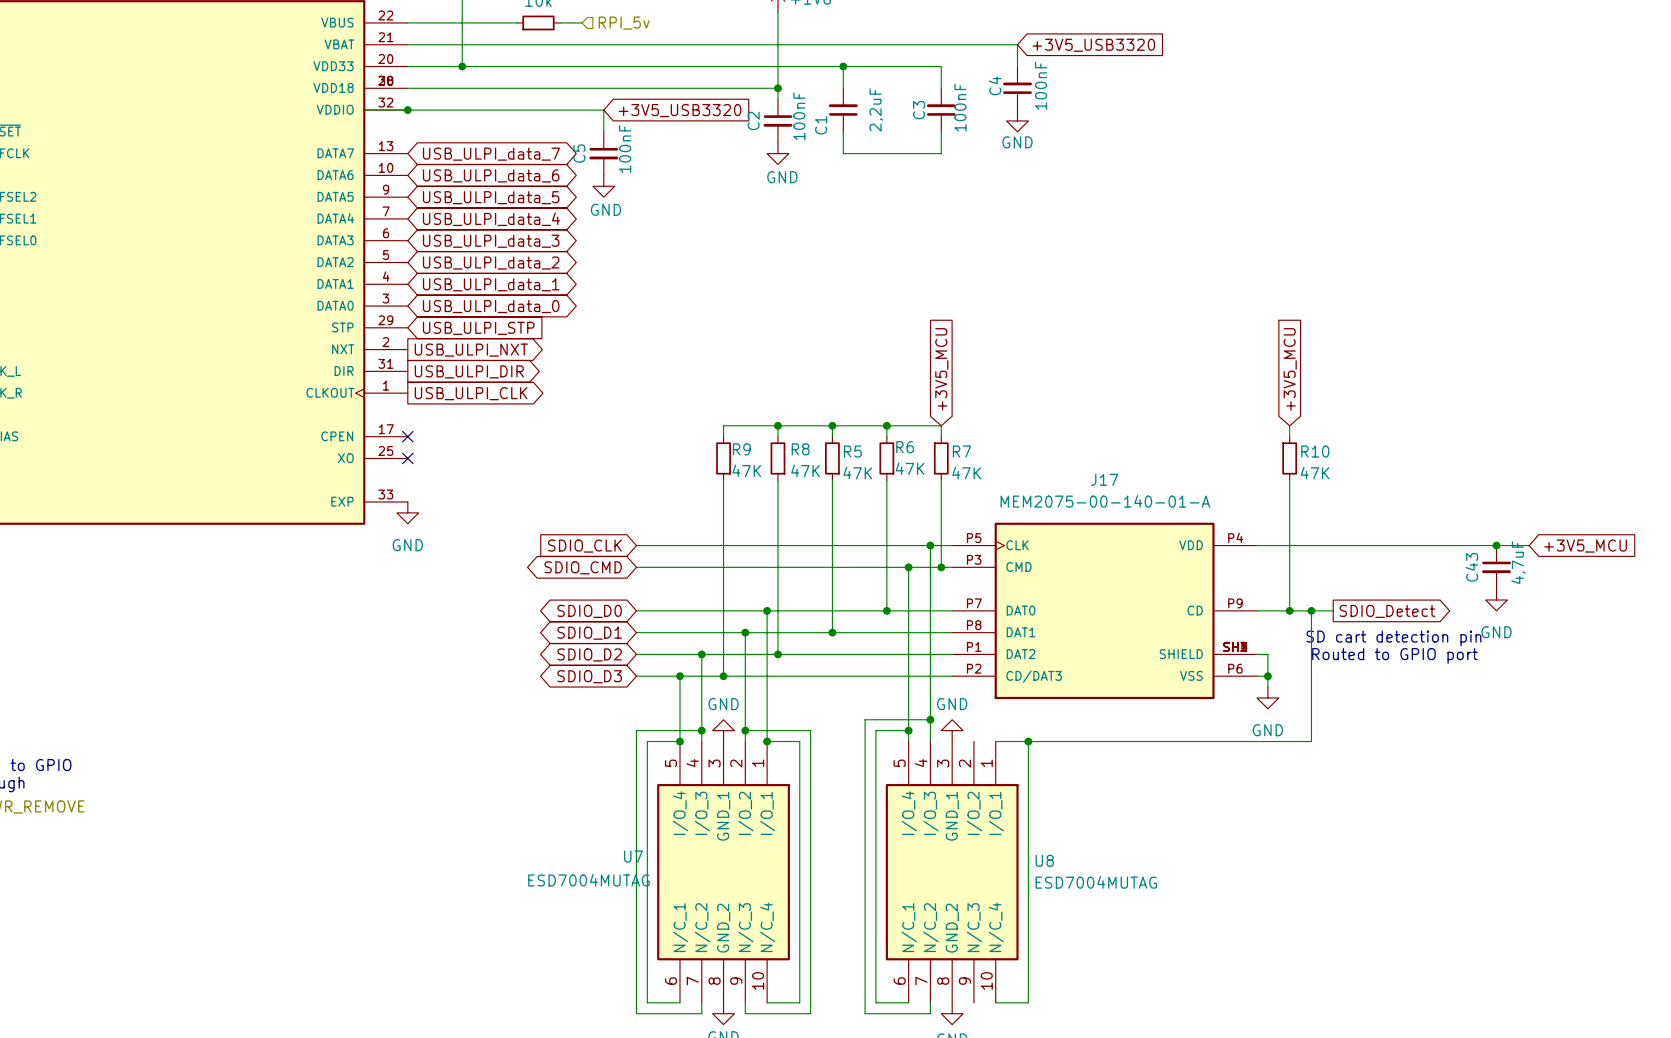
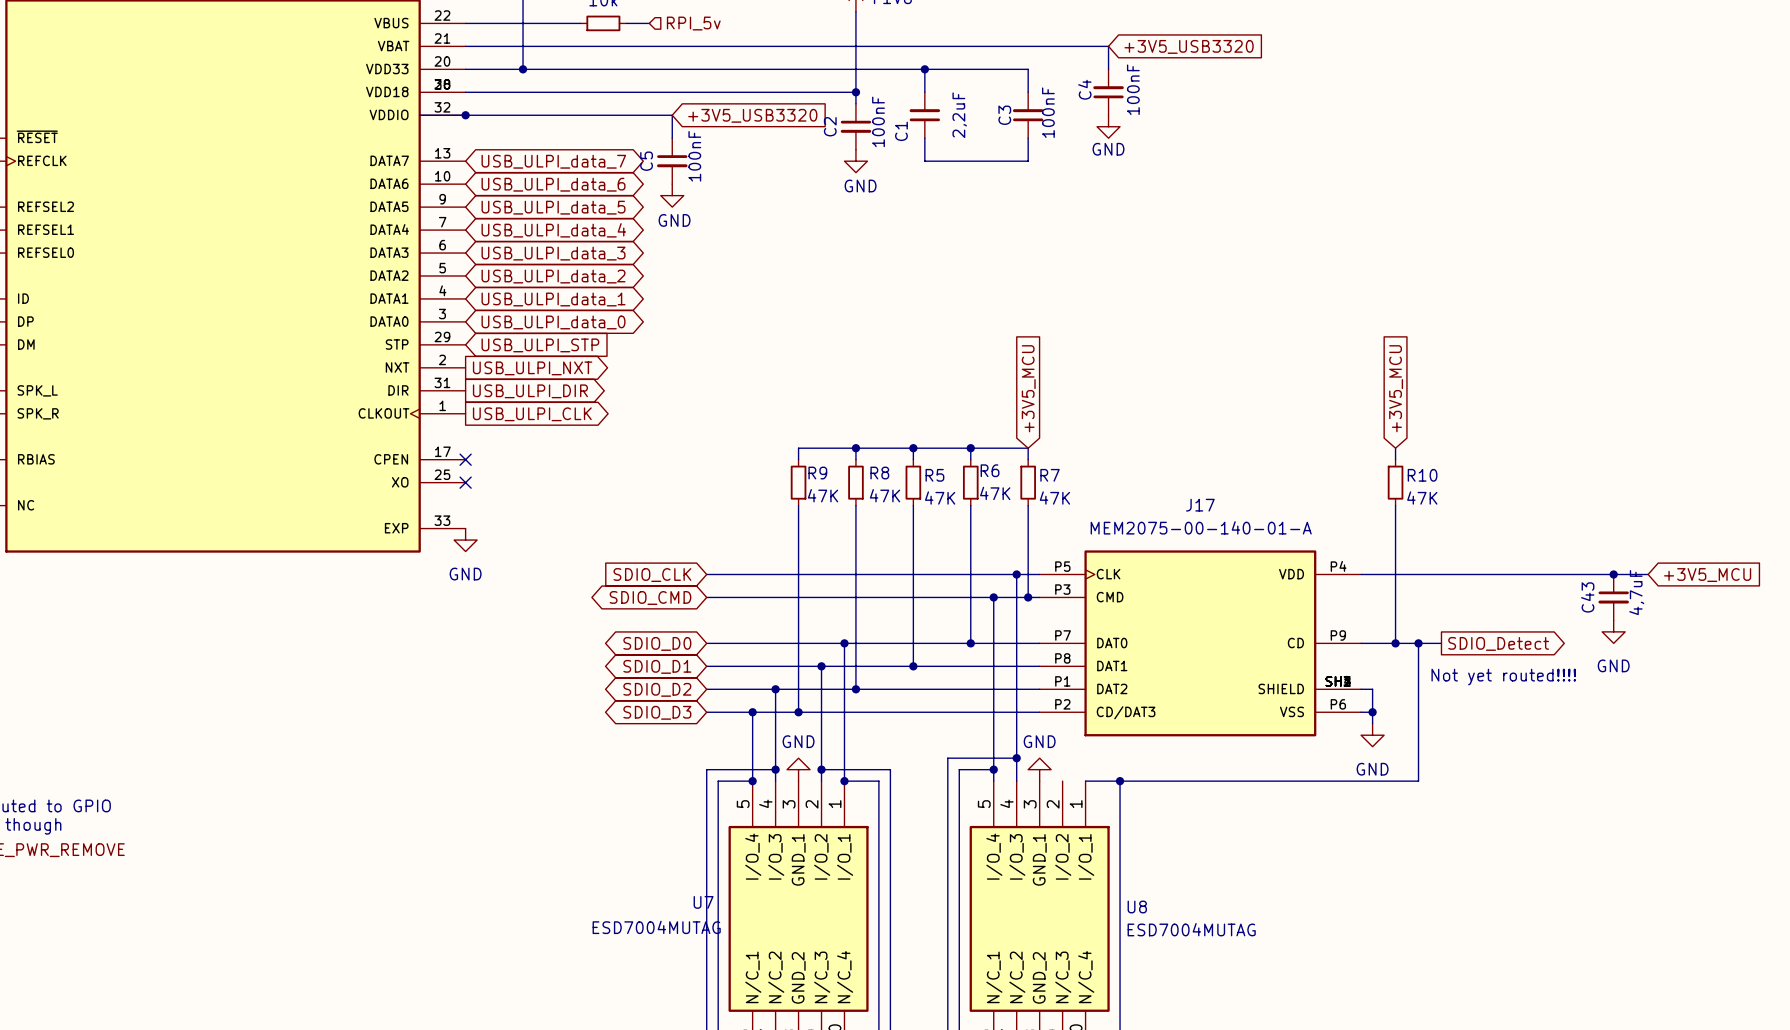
text: SD cart detection pin (1393, 638) -> Not yet routed!!!! (1503, 677)
text: Routed to GPIO port (1394, 655) -> none

